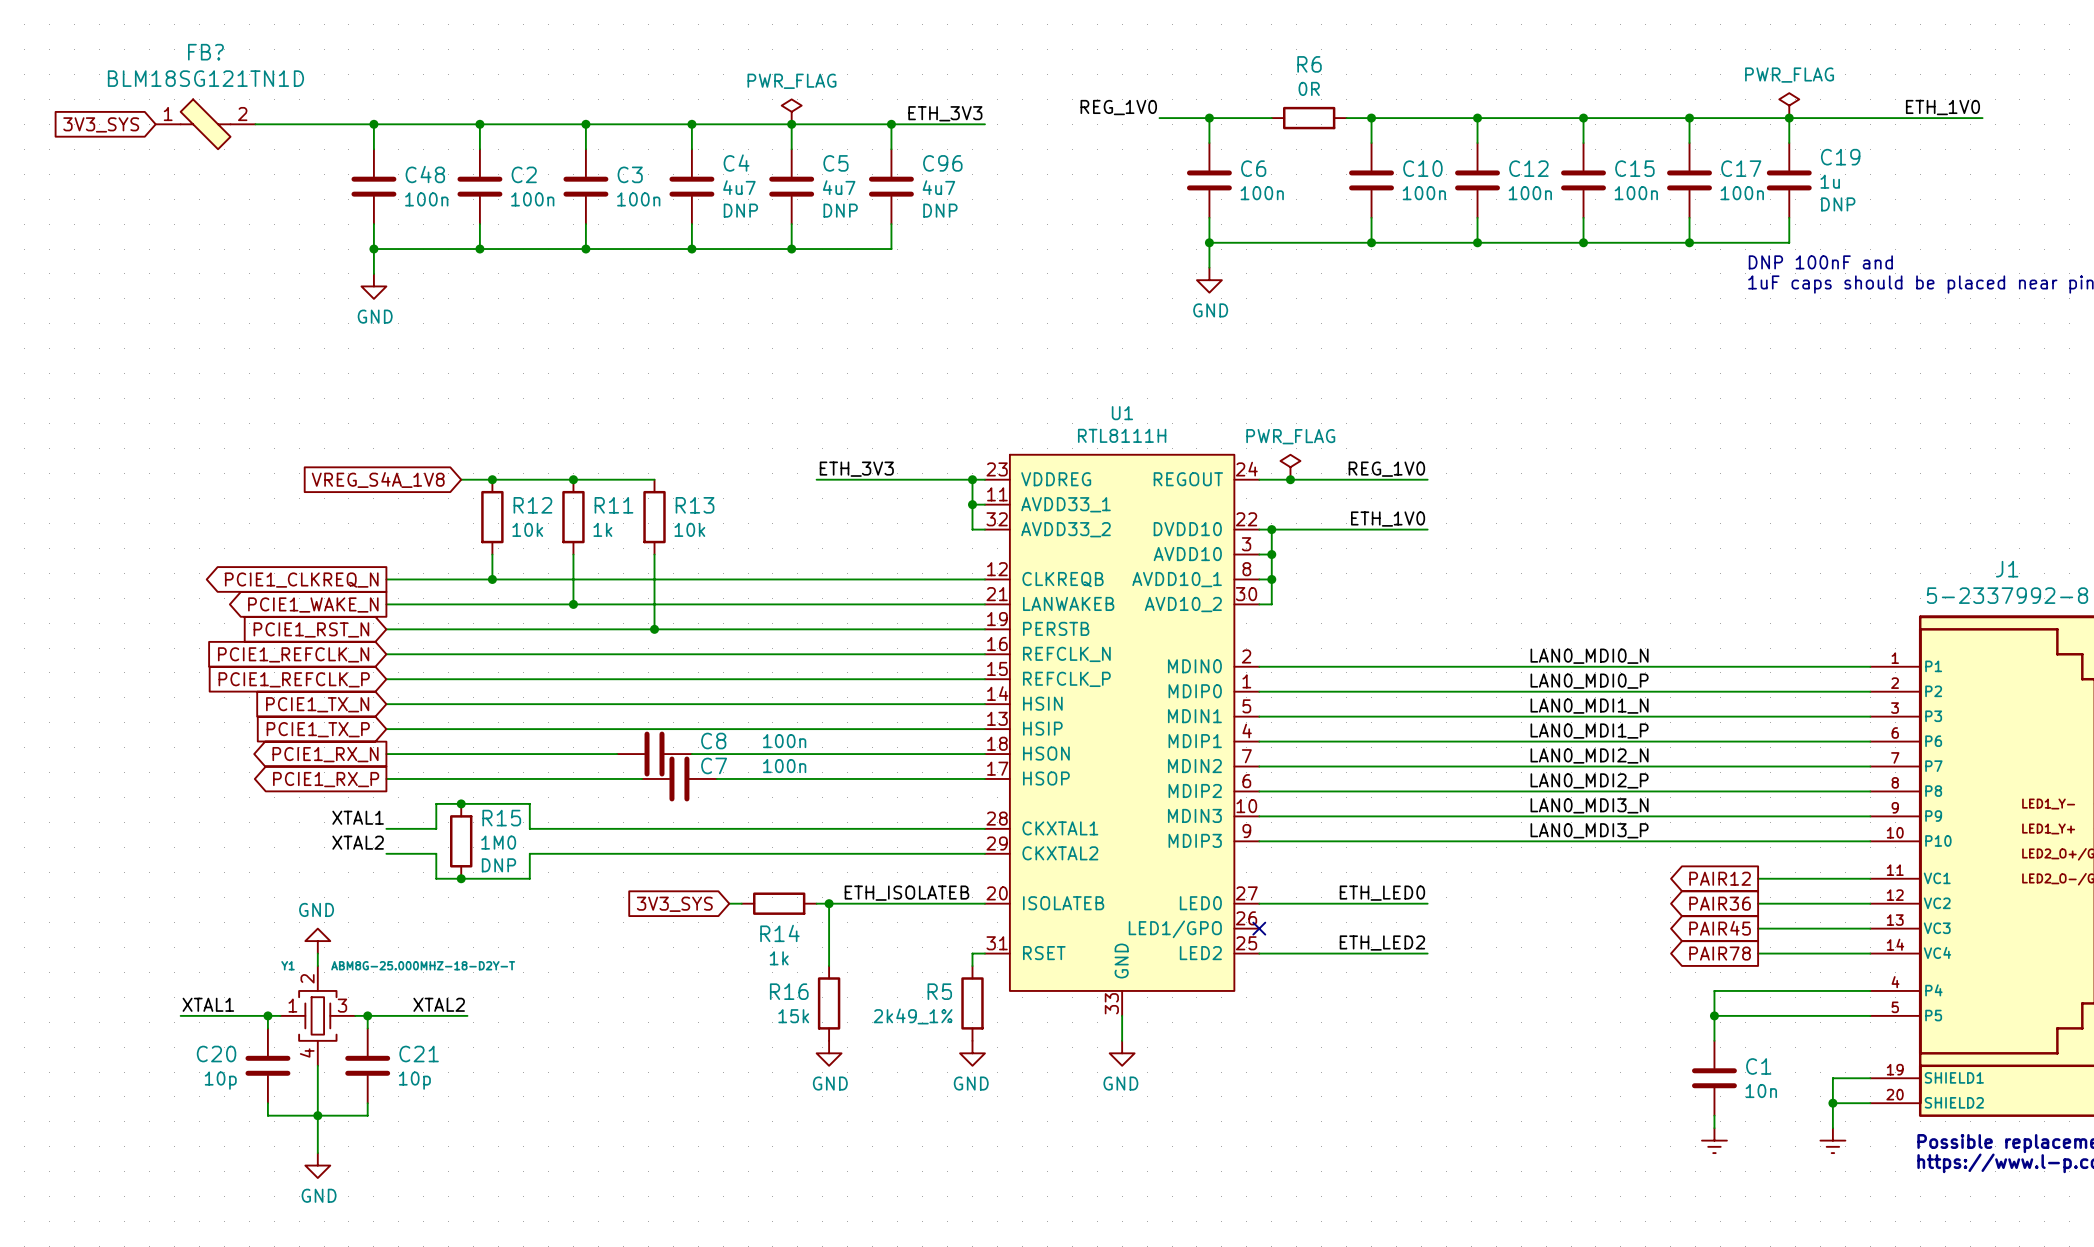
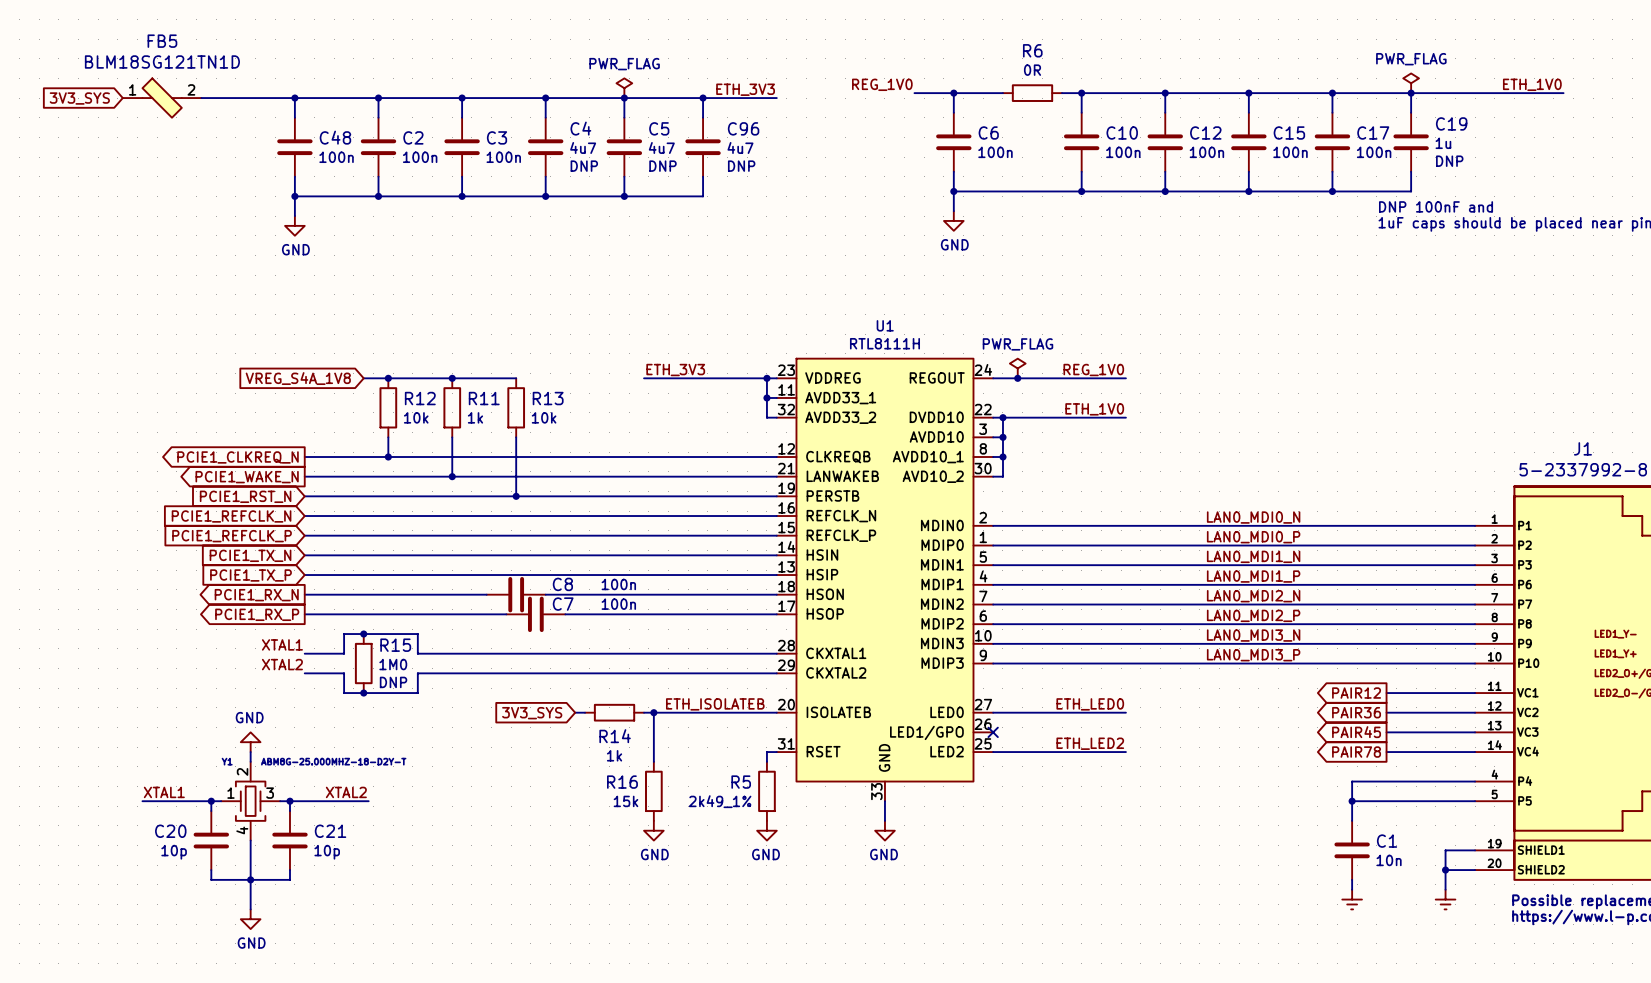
FB? name: FB? (205, 52) -> FB5 (162, 41)

